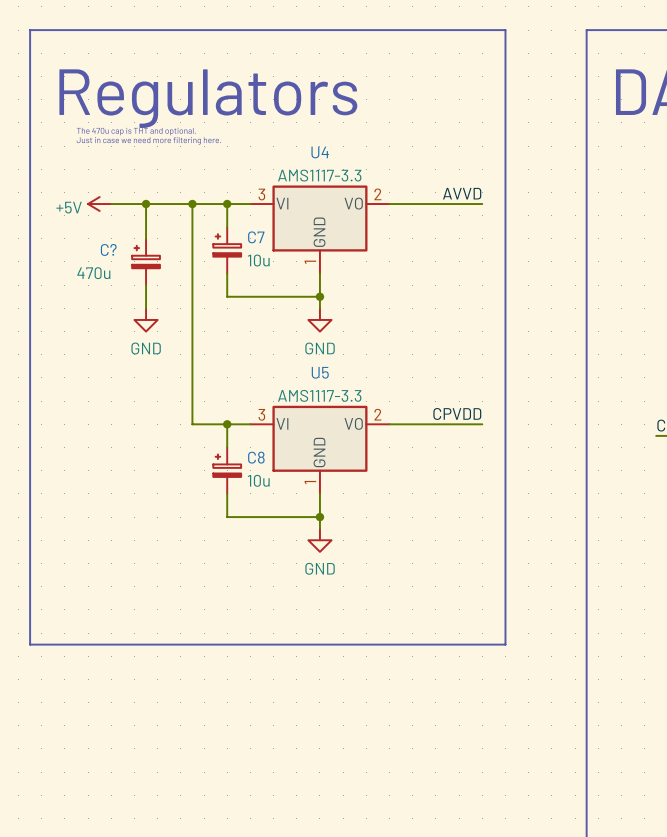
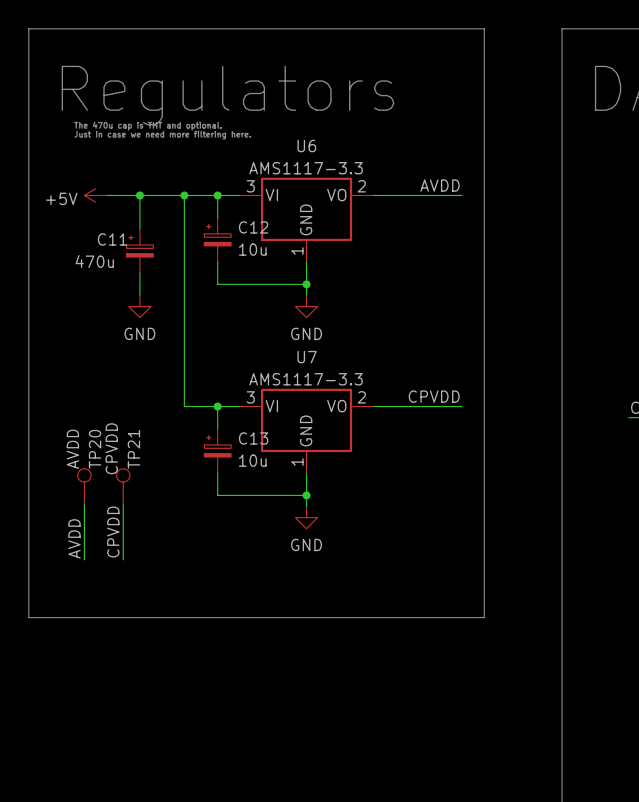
U4 name: U4 (320, 152) -> U6 (306, 146)
label: AVVD (462, 193) -> AVDD (440, 185)
C7 name: C7 (256, 237) -> C12 (253, 227)
C? name: C? (108, 249) -> C11 (112, 239)
U5 name: U5 (320, 372) -> U7 (307, 357)
C8 name: C8 (256, 457) -> C13 (253, 438)
TP20: none -> AVDD (84, 486)
TP21: none -> CPVDD (123, 486)
wire: none -> (84, 504) (84, 559)
wire: none -> (123, 504) (123, 559)
label: none -> CPVDD (113, 531)
label: none -> AVDD (74, 538)

